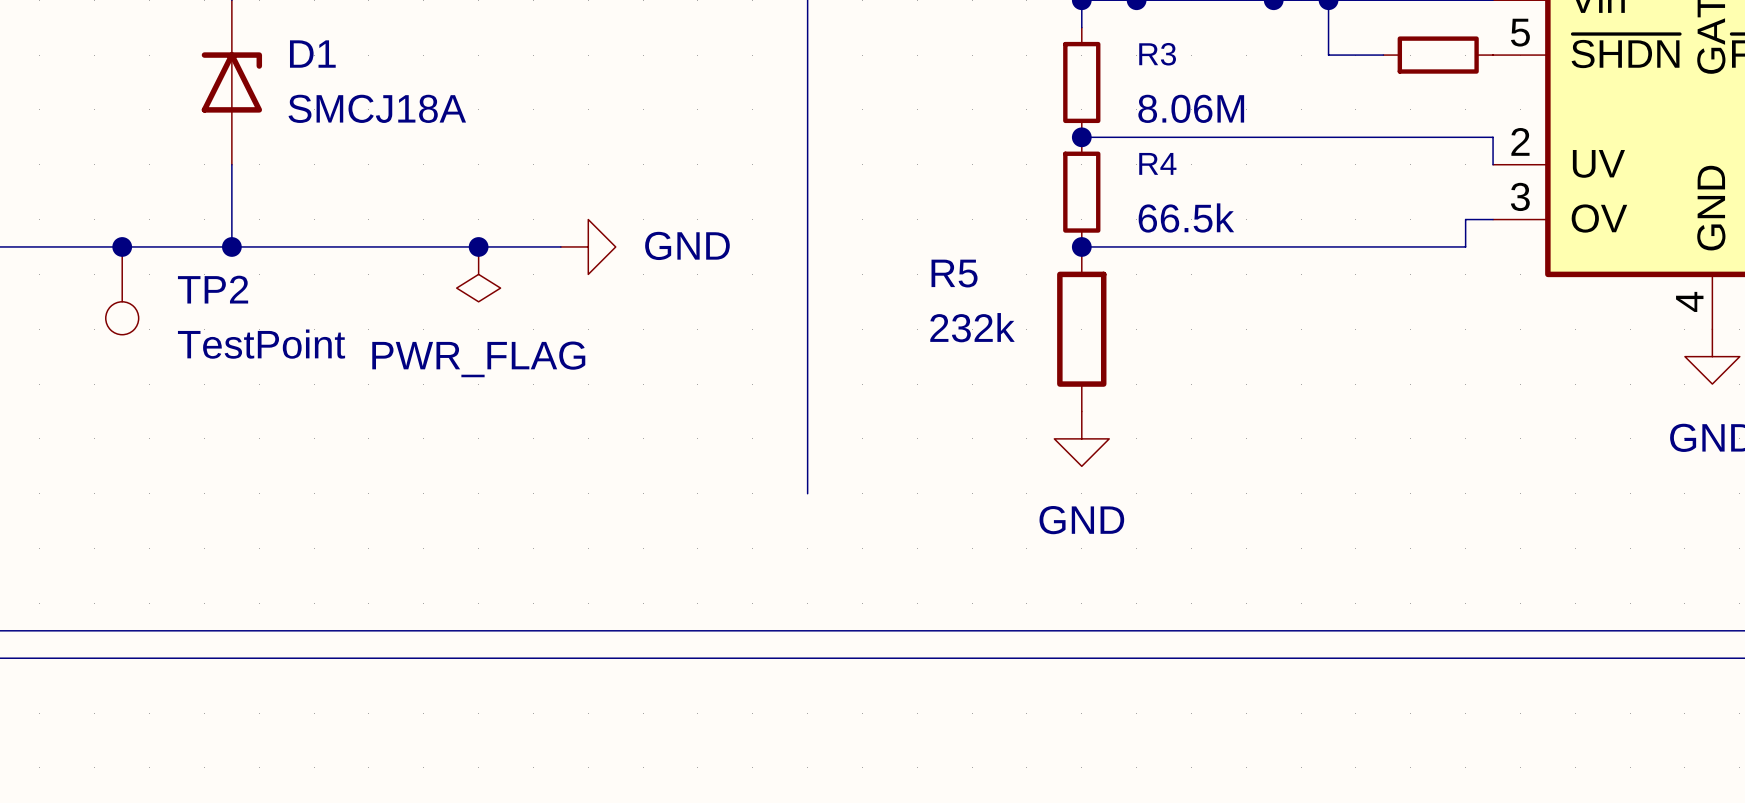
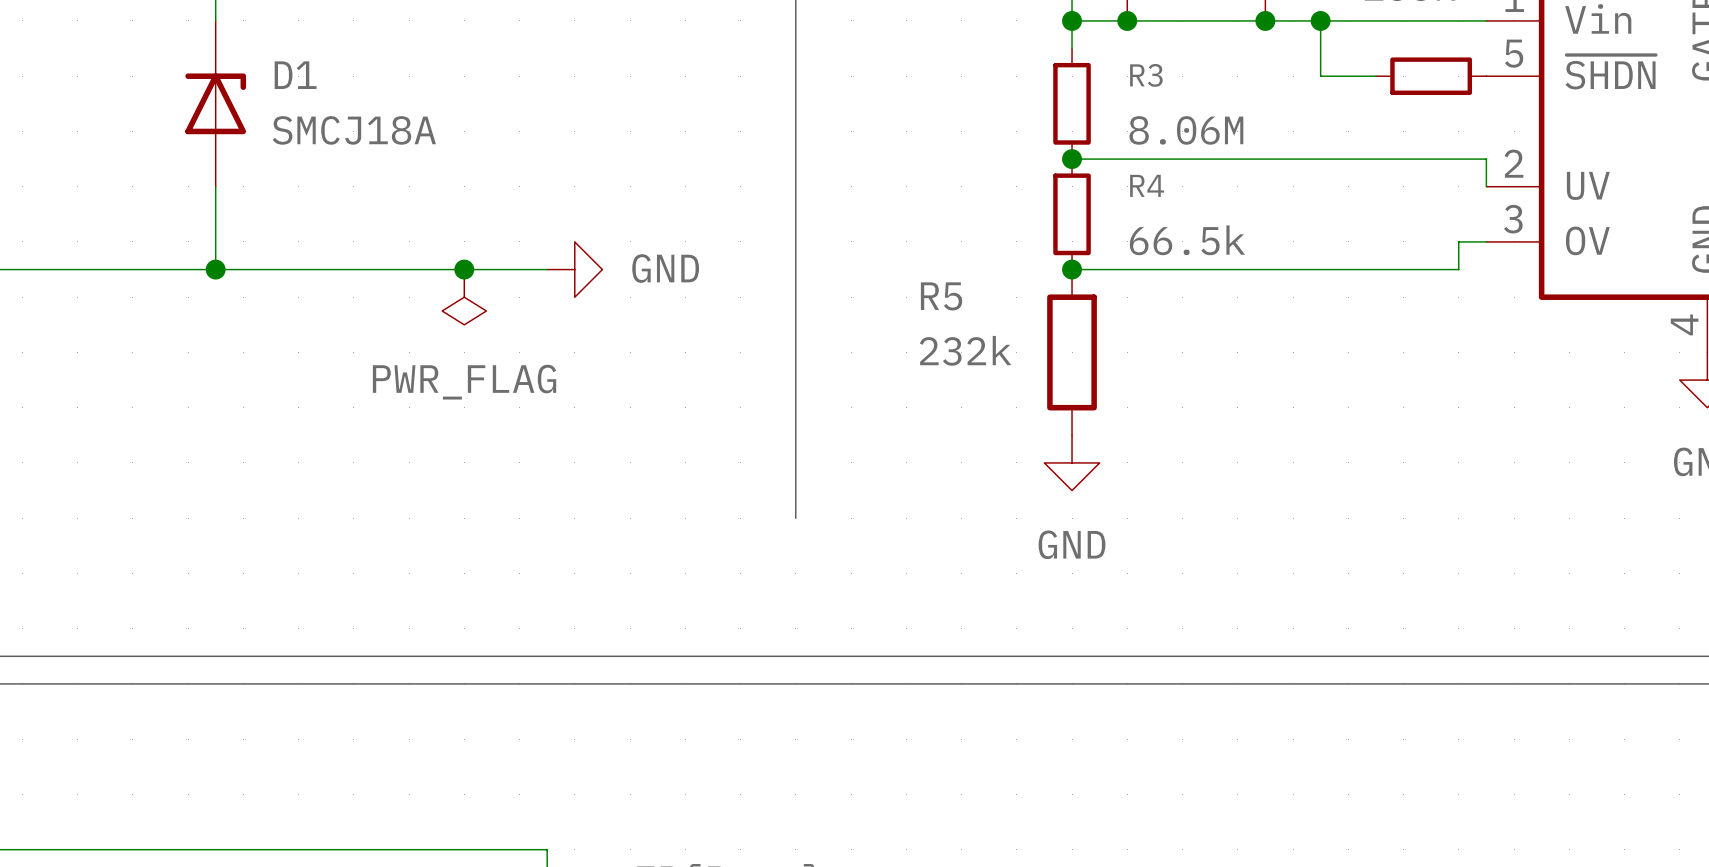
junction: (122, 246) -> none
TP2: TestPoint (122, 290) -> none

